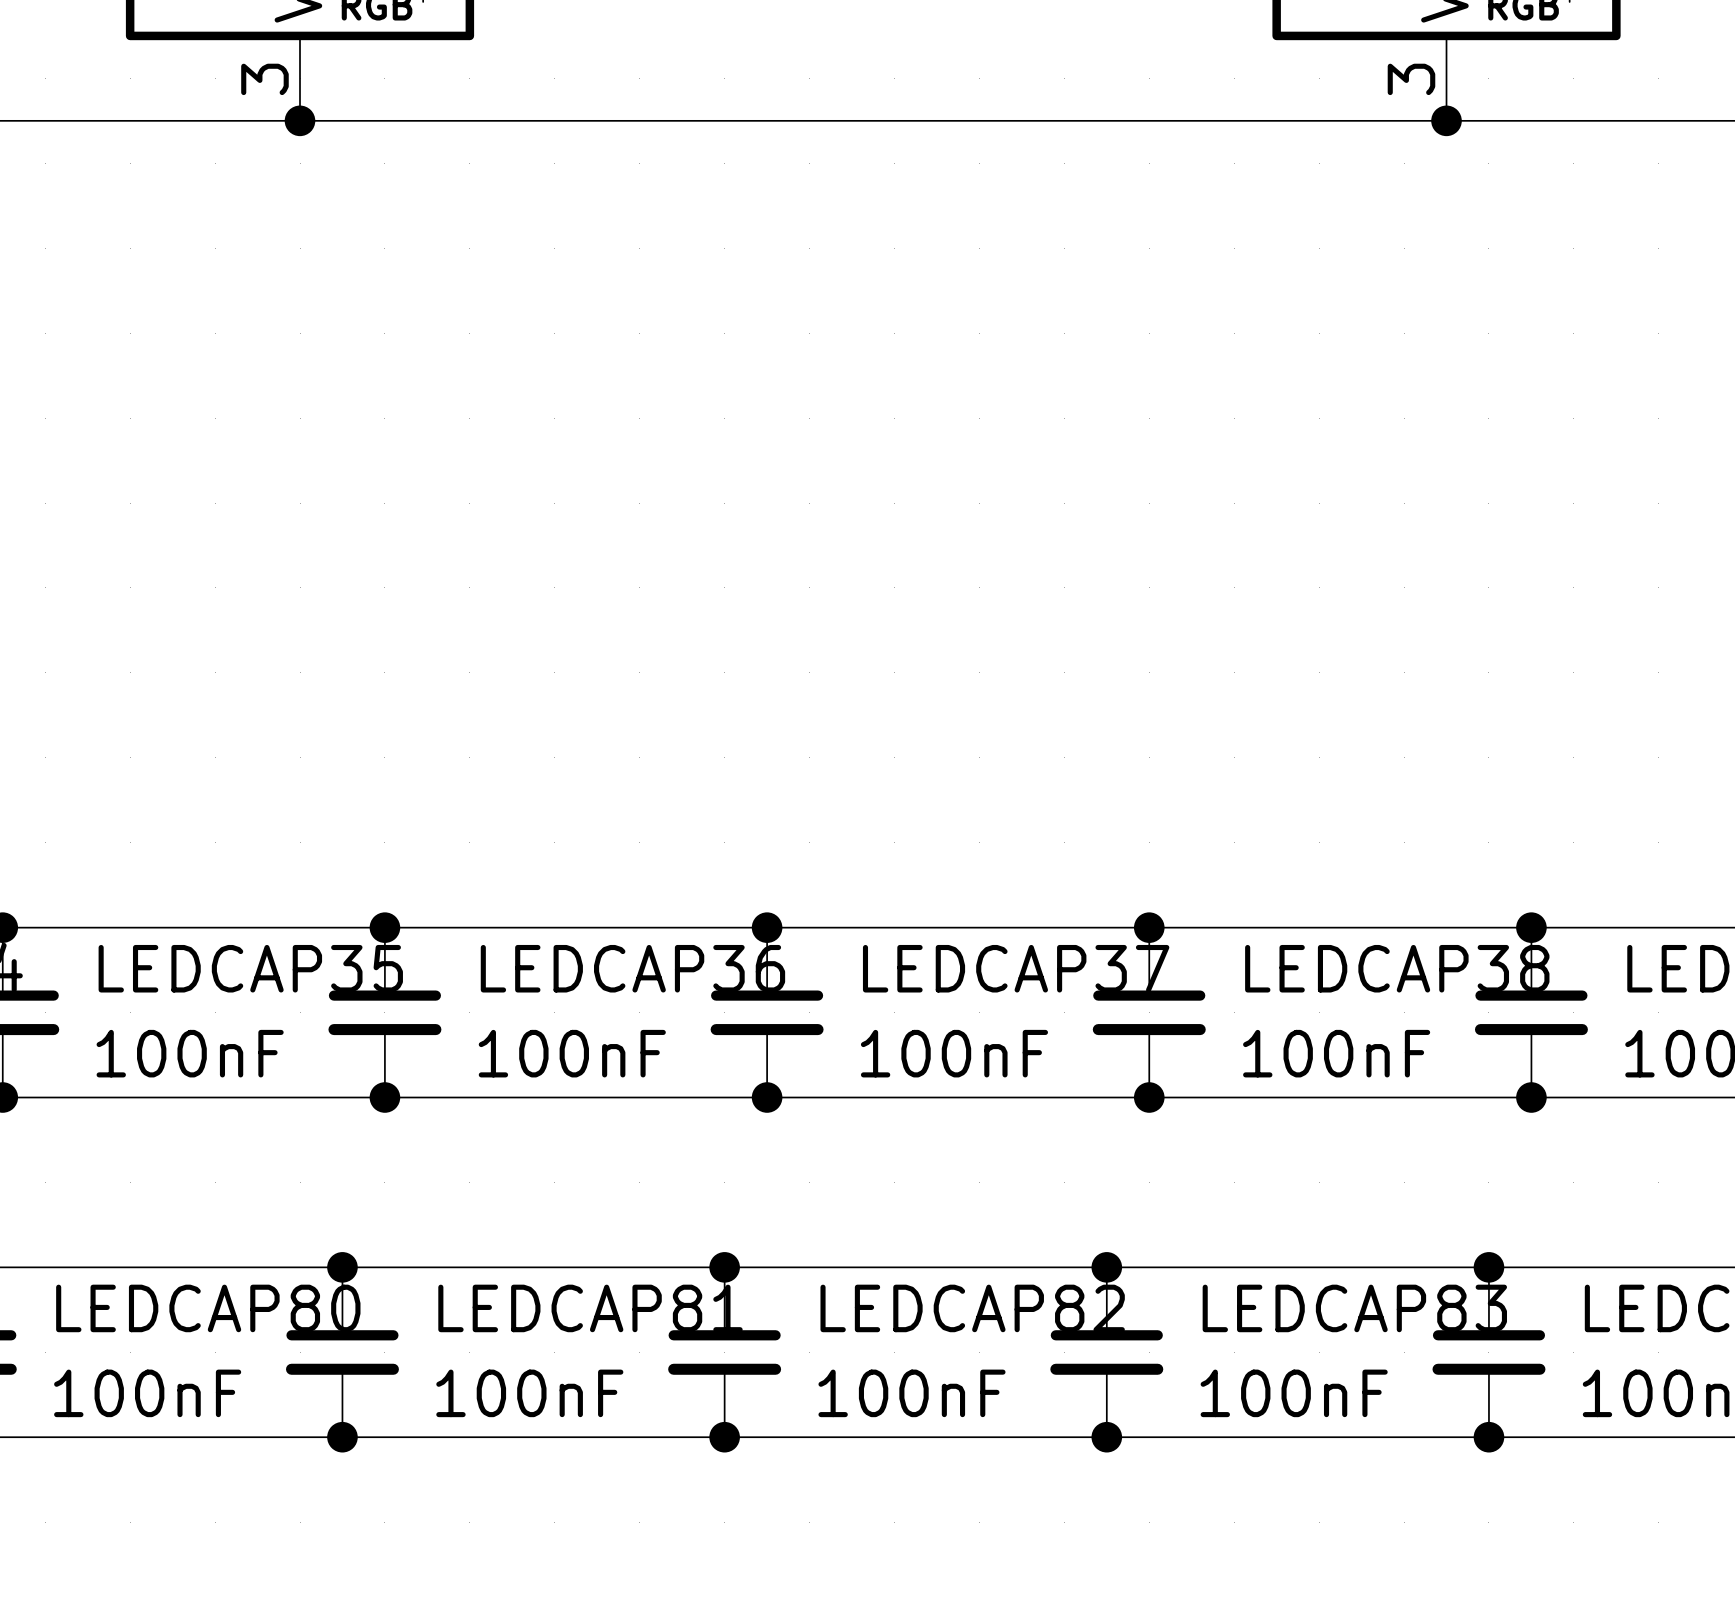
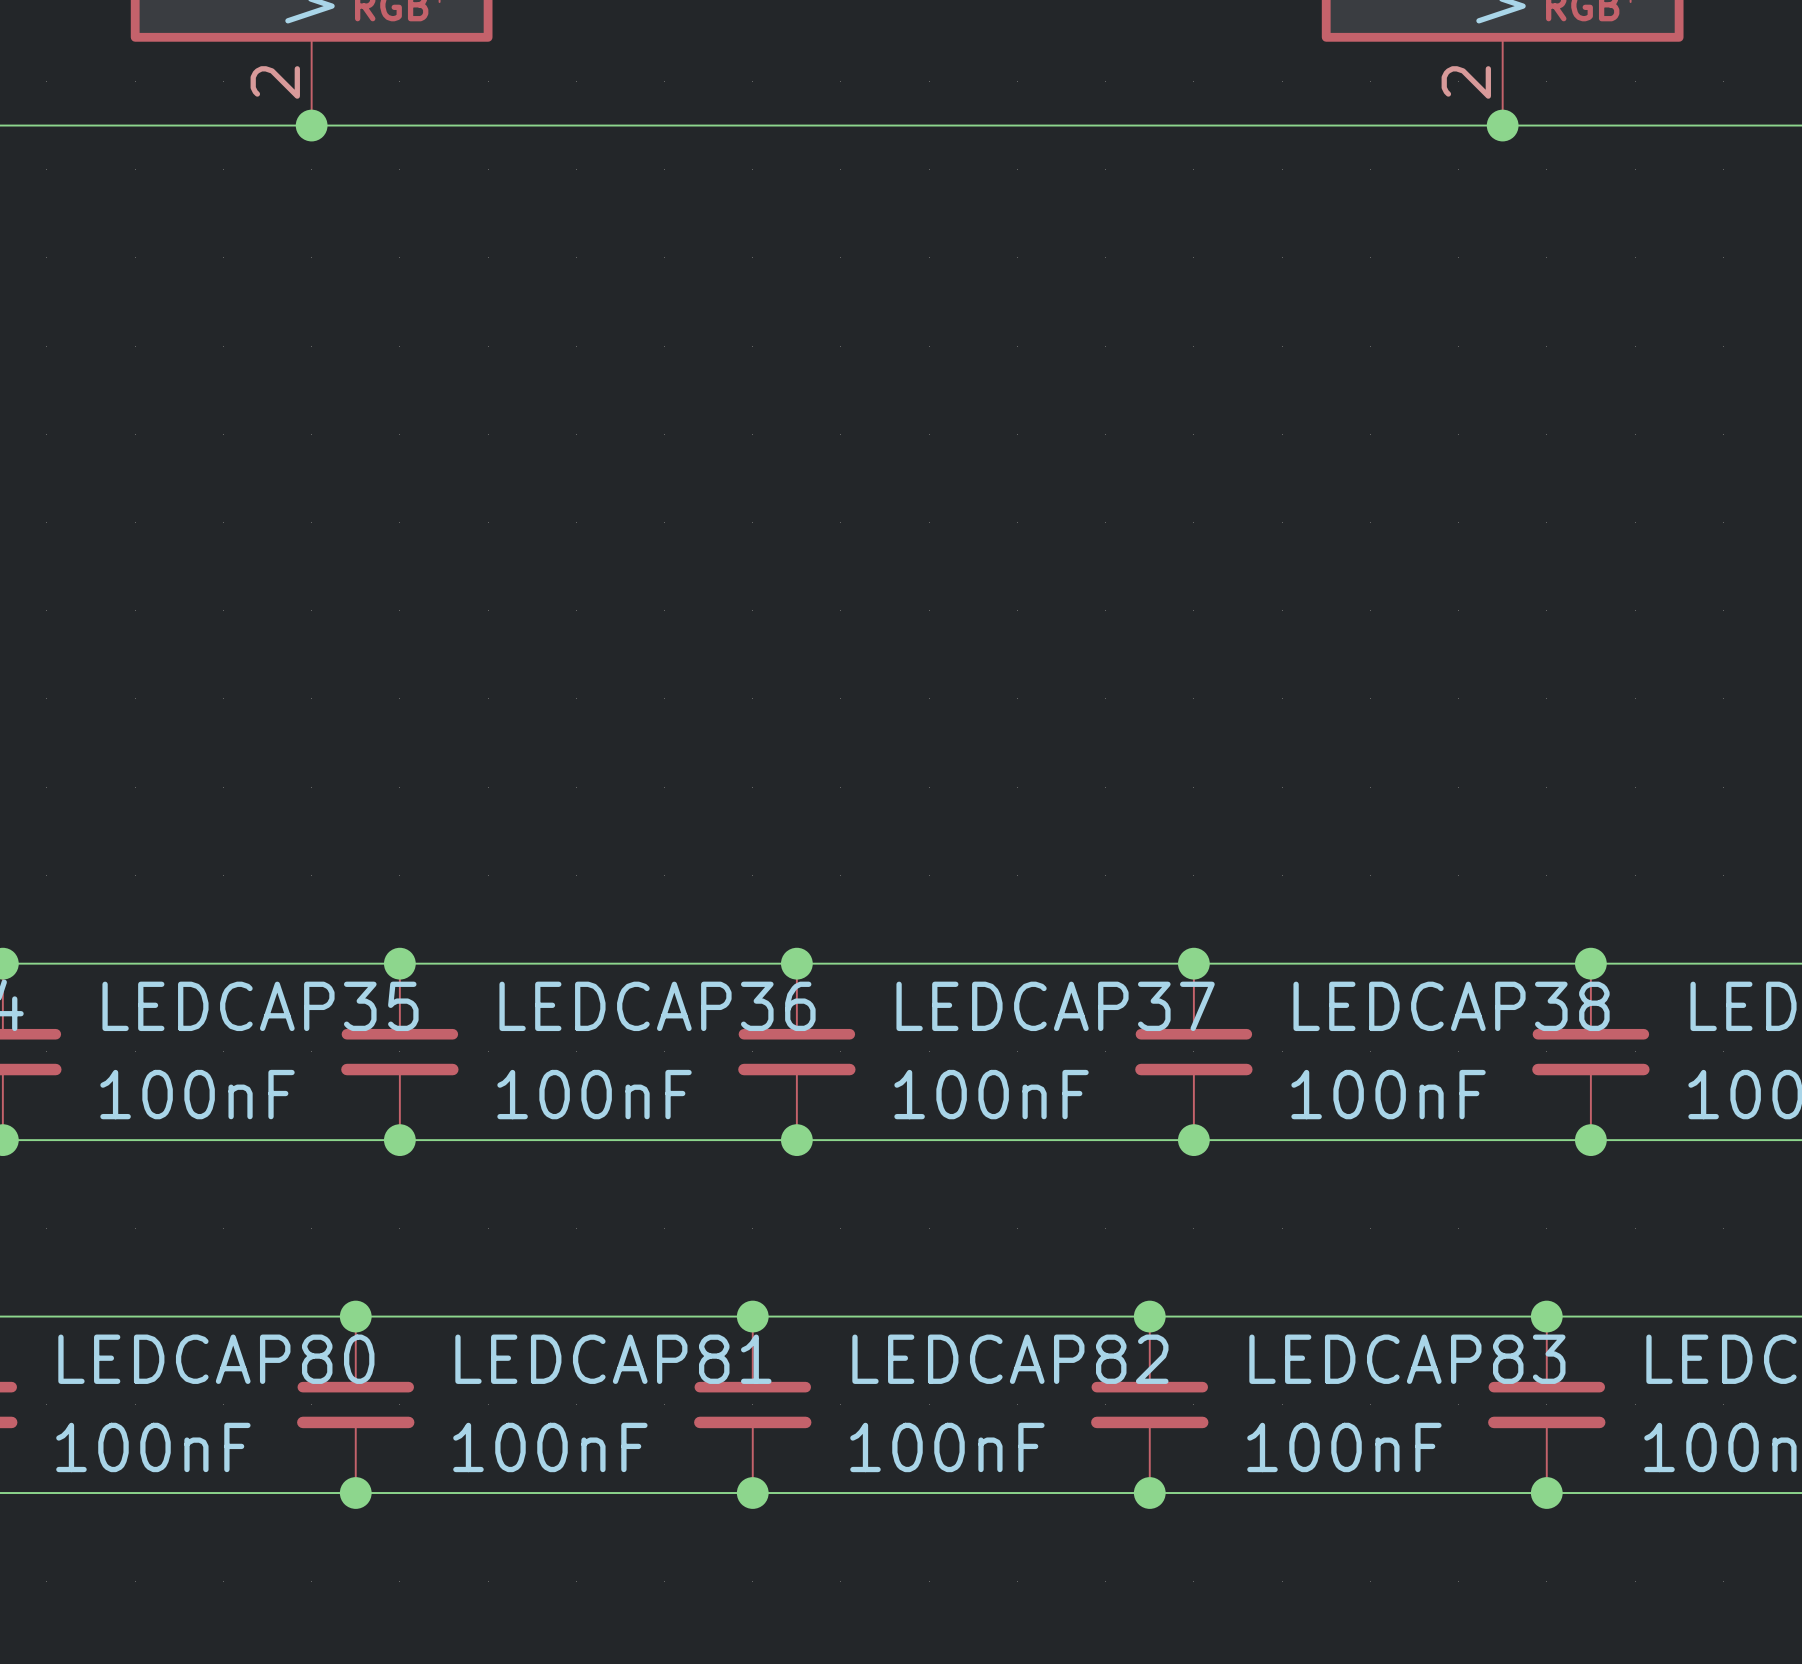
part pin number: 3 (264, 79) -> 2 (275, 82)
part pin number: 3 (1411, 79) -> 2 (1466, 82)

